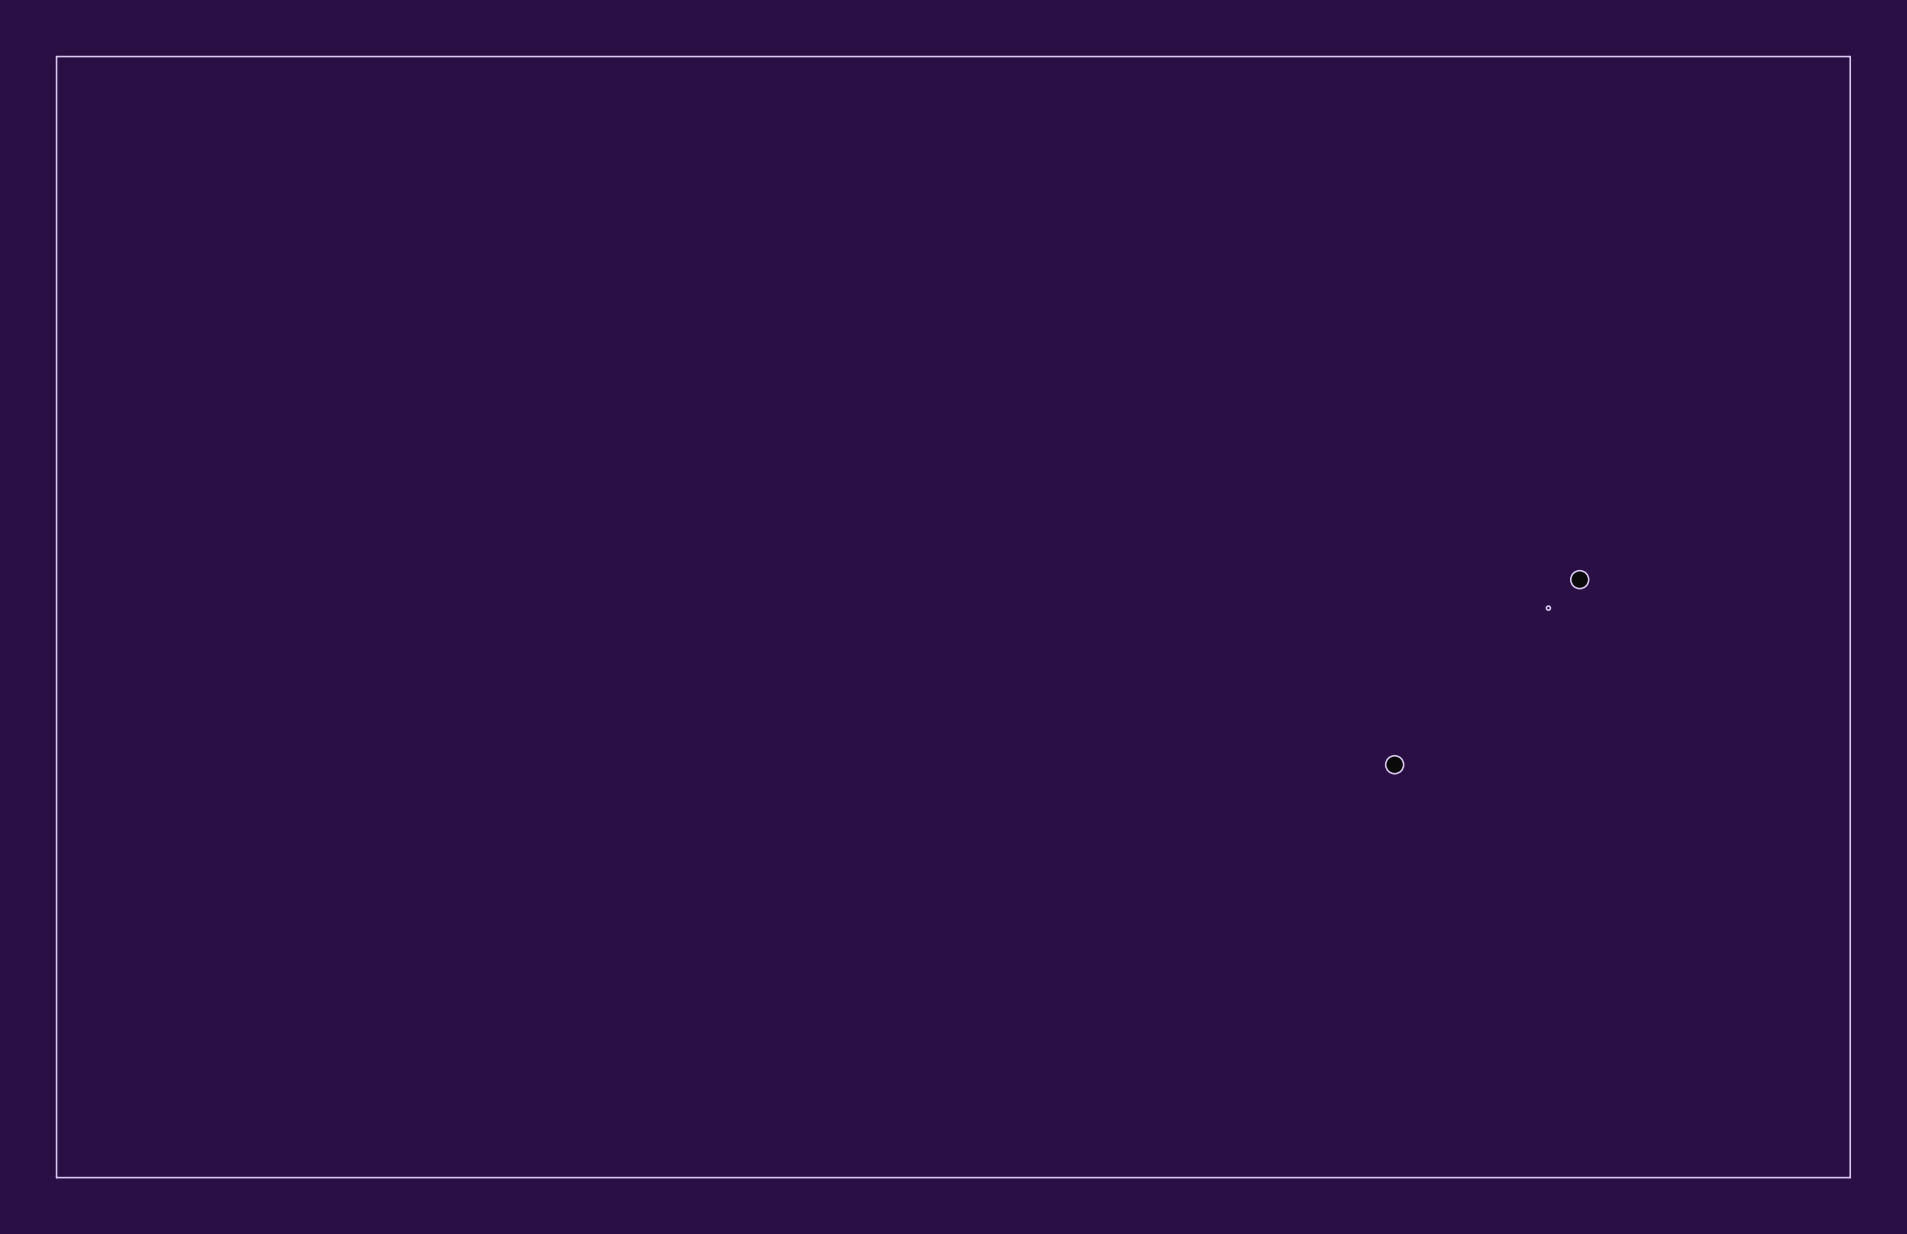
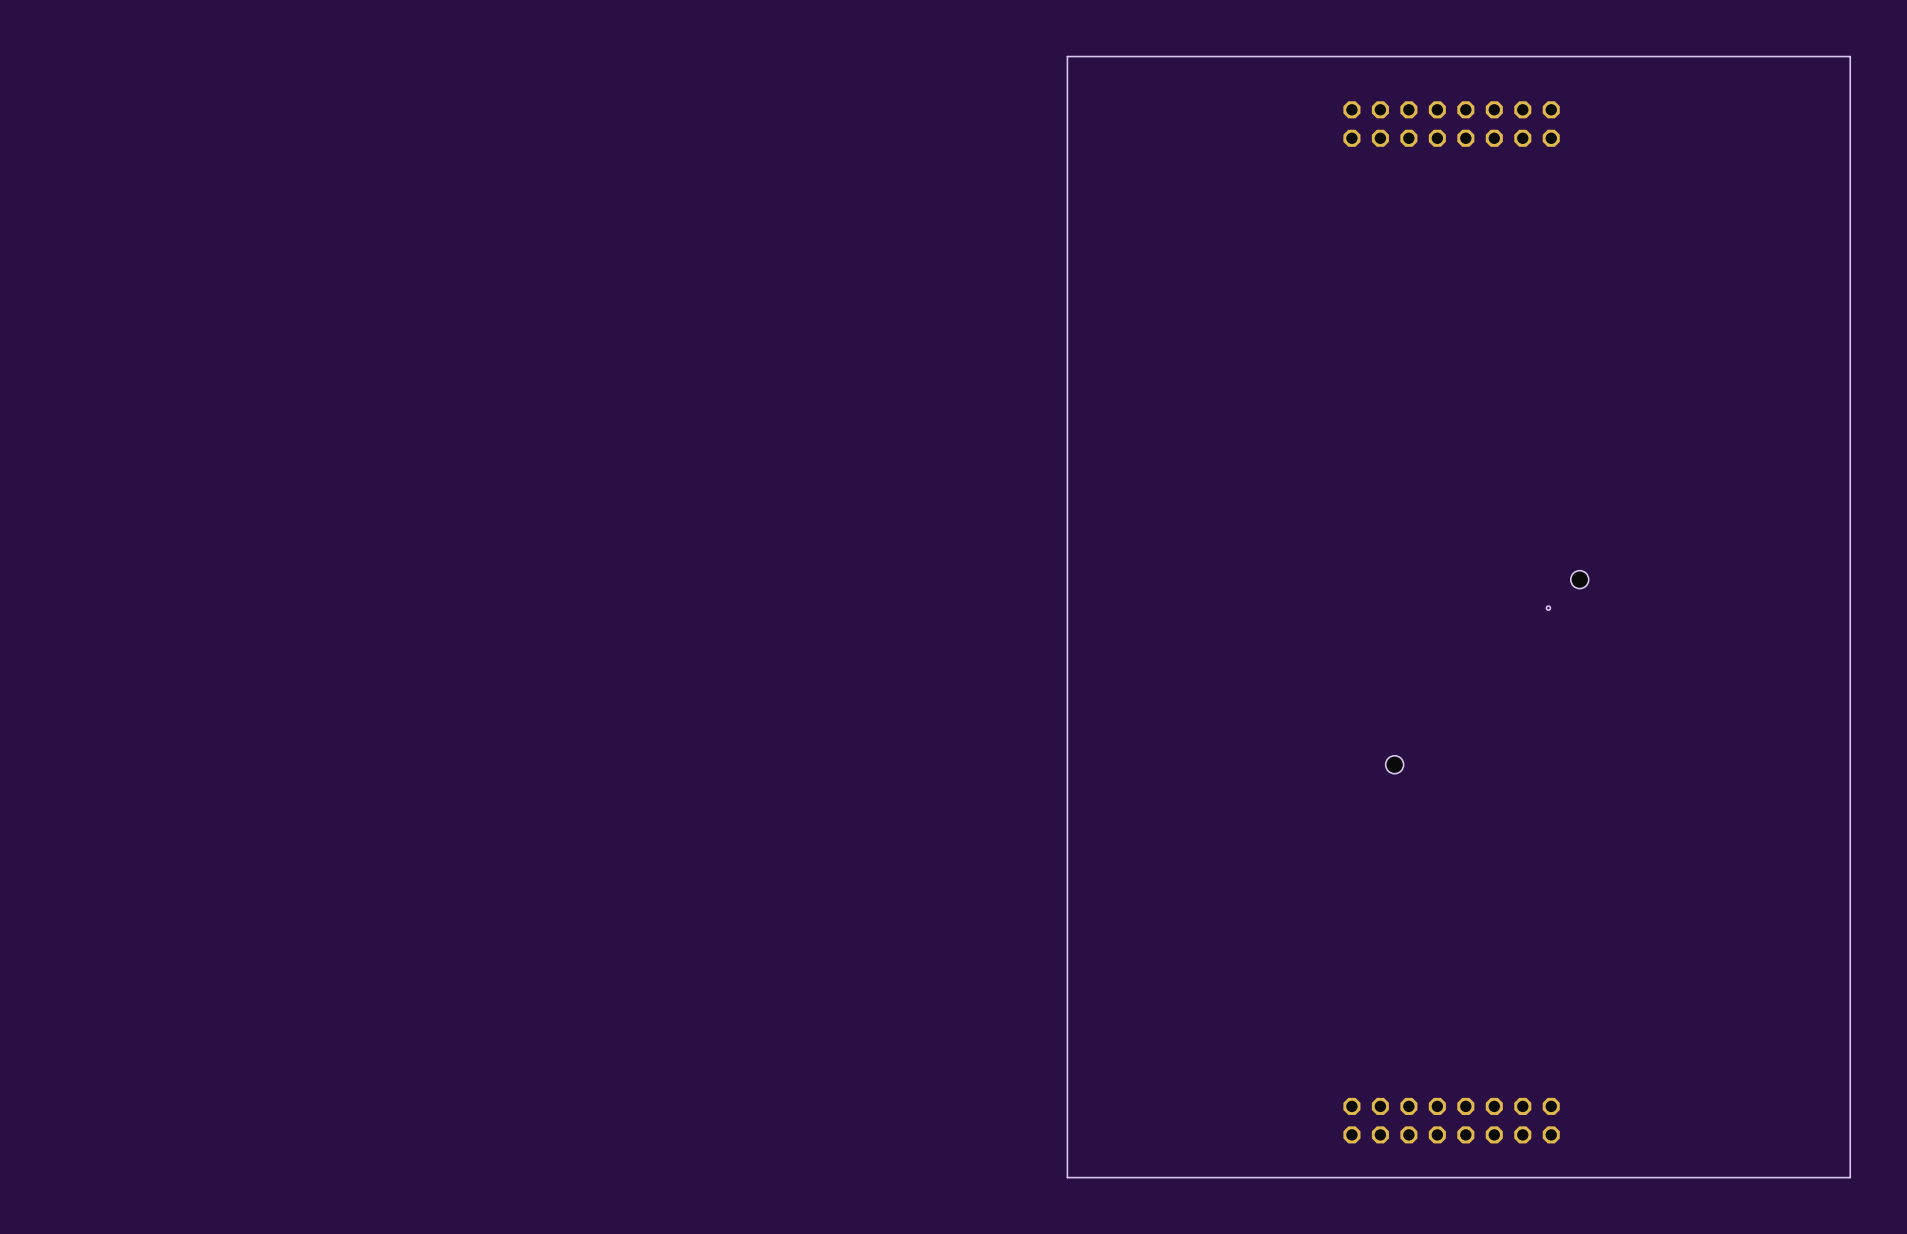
board edge: (1067, 56) (56, 56) (56, 1177) (1067, 1177) -> (1067, 56) (1067, 1177)
part: none -> (1451, 124)
part: none -> (1451, 1120)

